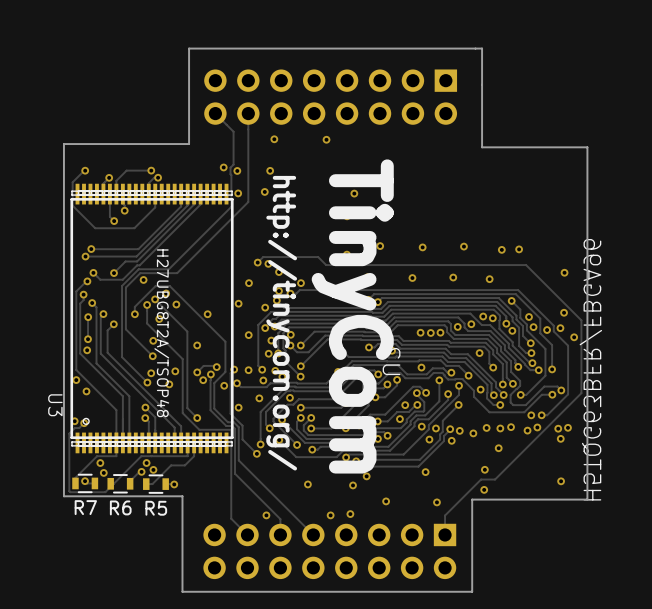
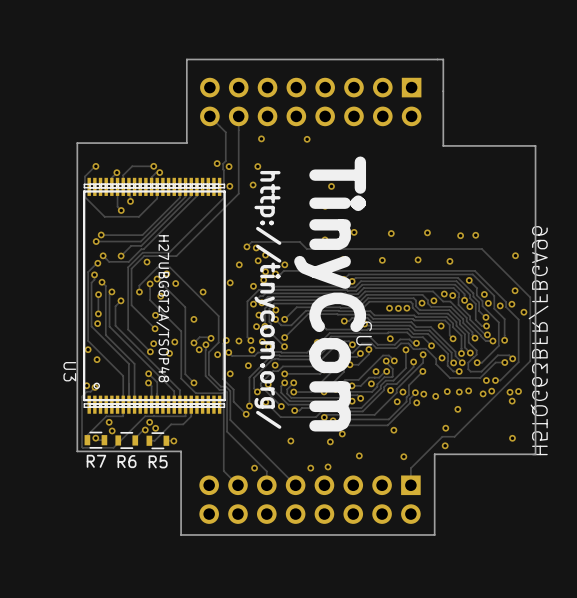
via position: (248, 335) -> (258, 260)

